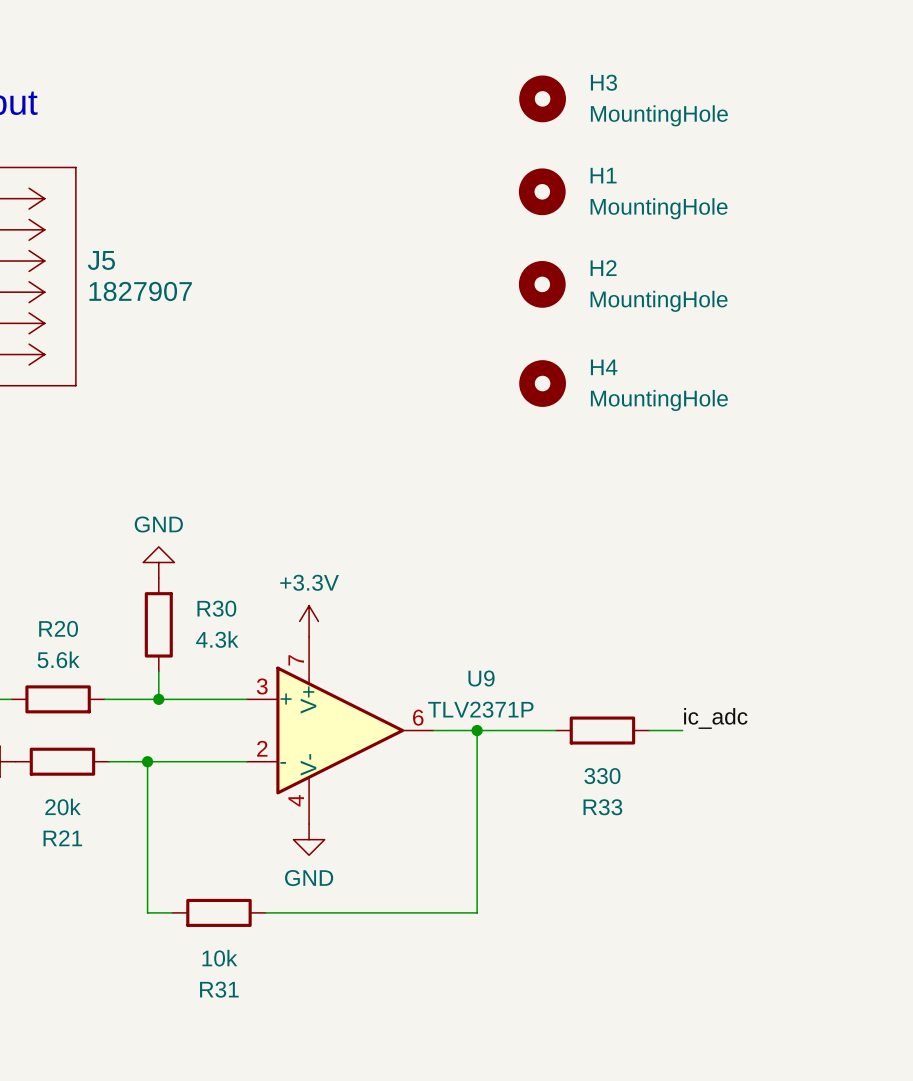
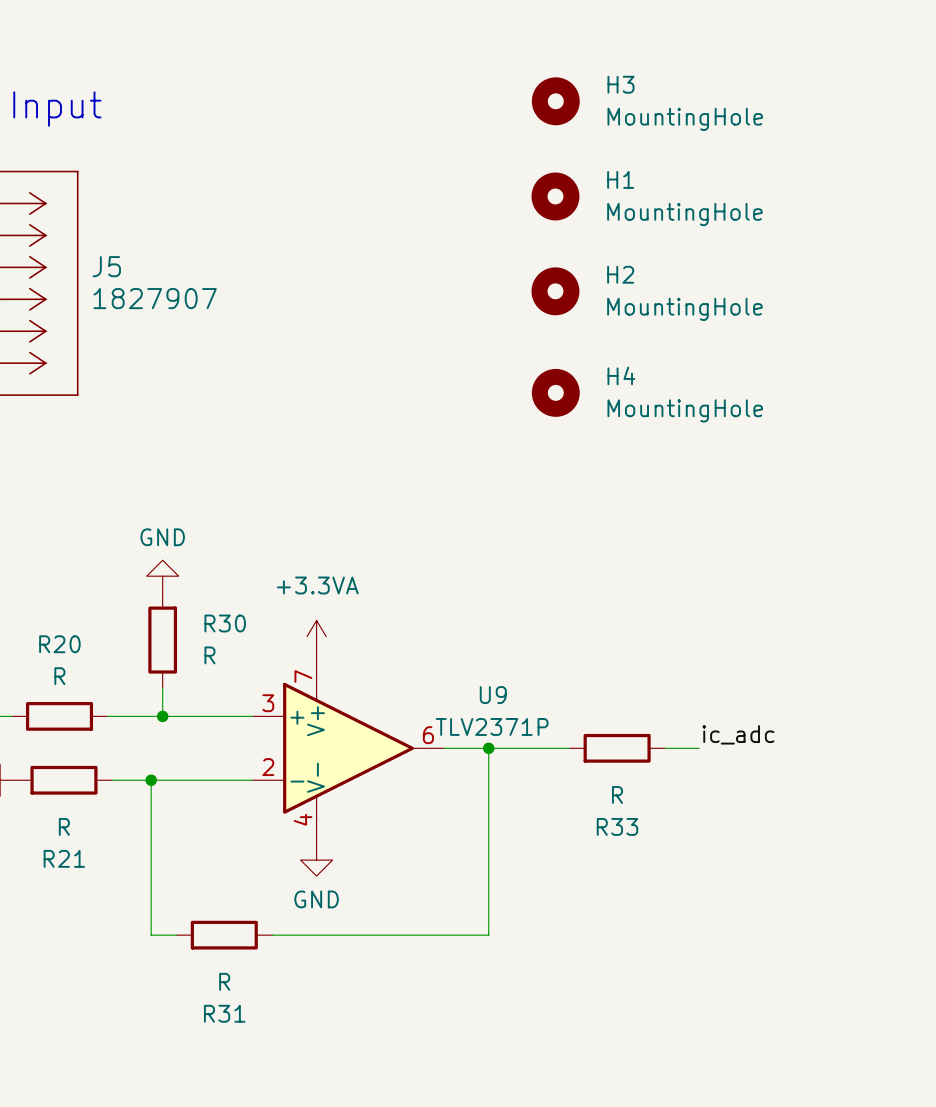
power symbol: +3.3V (309, 621) -> +3.3VA (316, 636)
R30 value: 4.3k (217, 639) -> R (209, 655)
R20 value: 5.6k (58, 659) -> R (59, 676)
R33 value: 330 (602, 776) -> R (617, 794)
R21 value: 20k (63, 806) -> R (64, 826)
R31 value: 10k (219, 958) -> R (224, 981)

